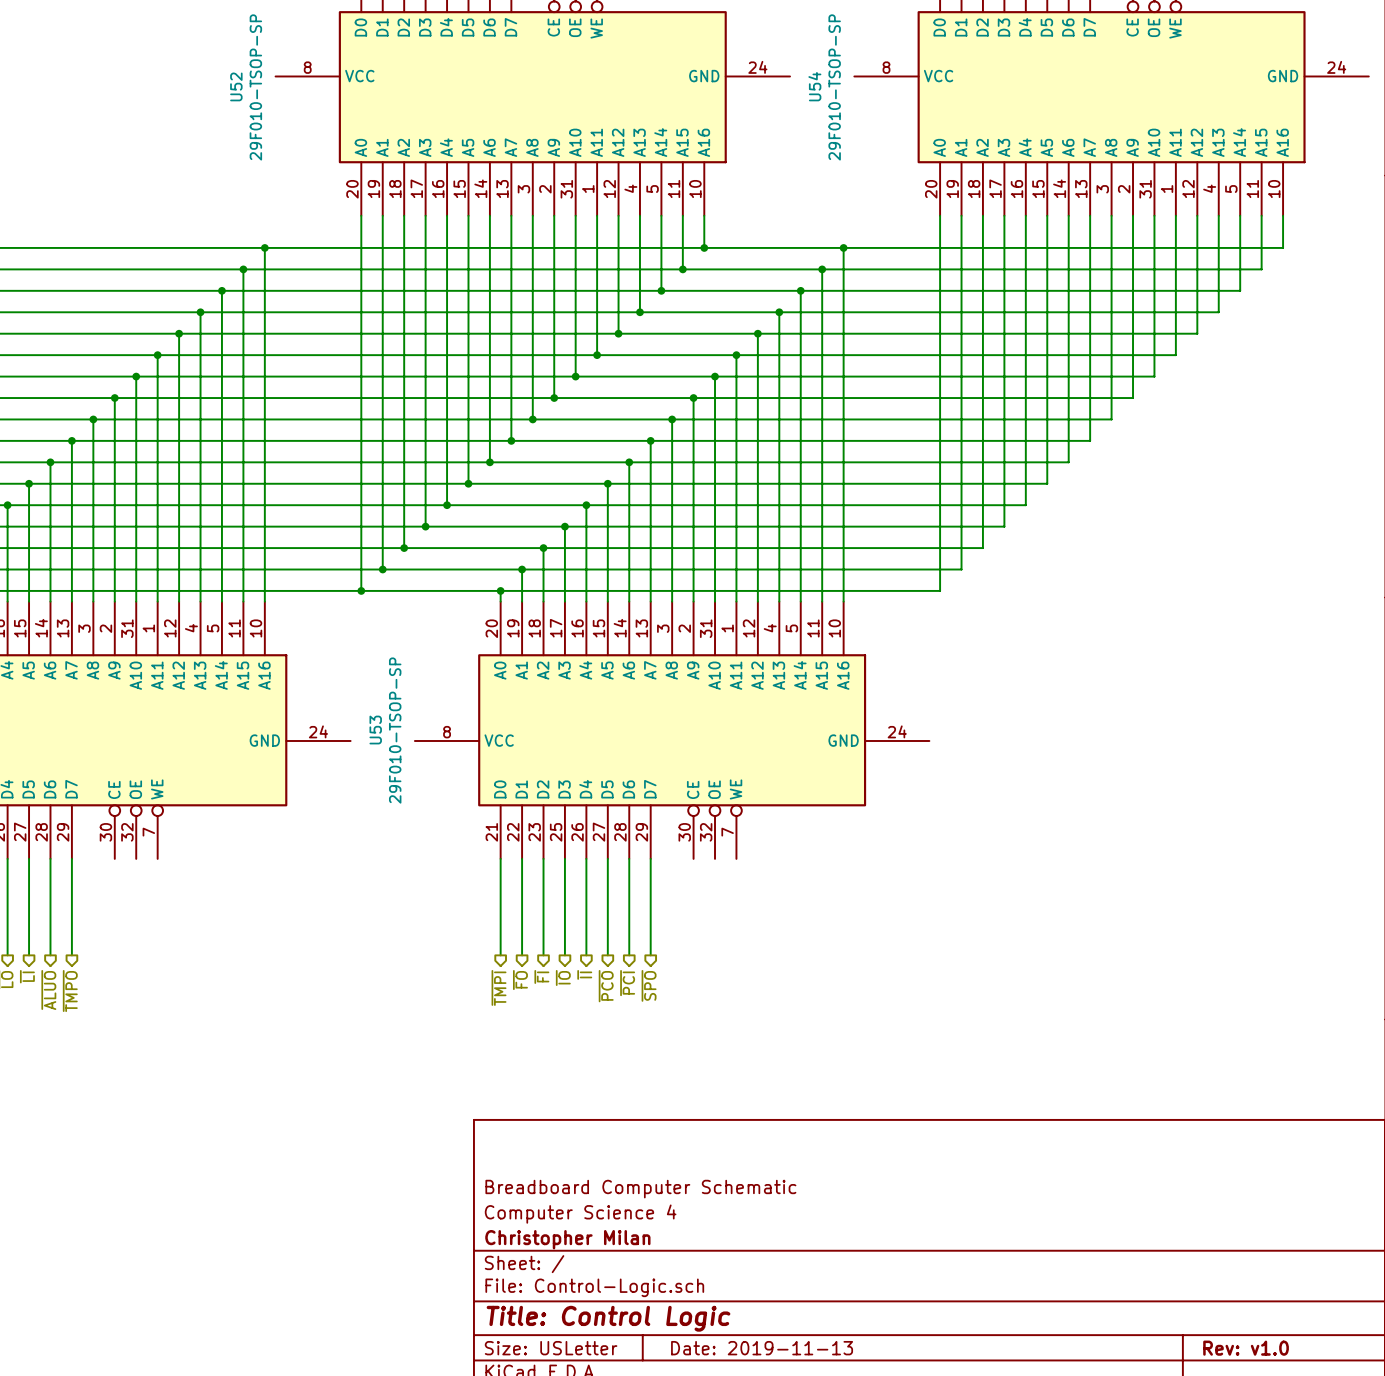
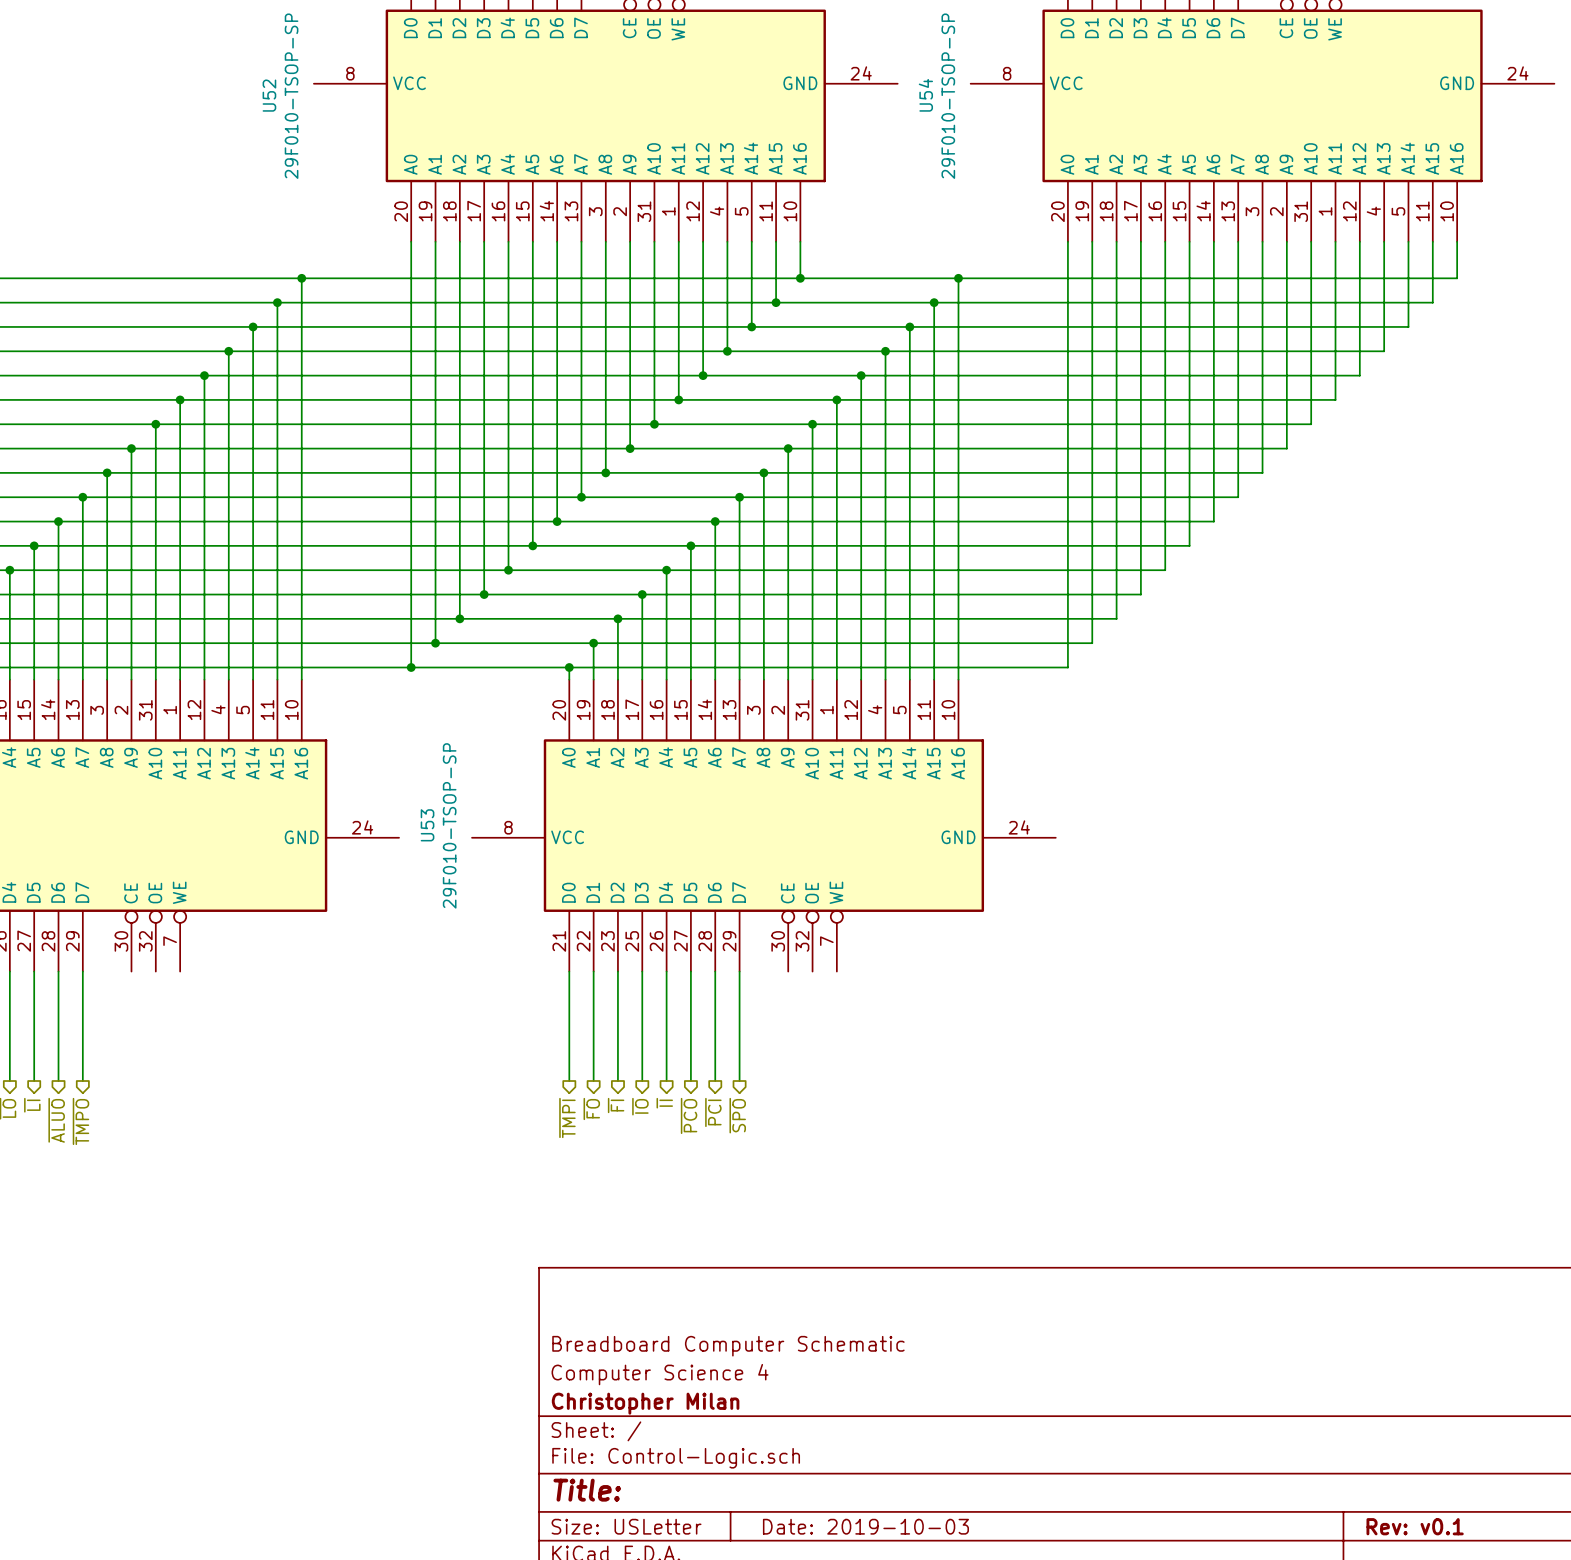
title block: Title: Control Logic (608, 1318) -> Title: (587, 1490)
title block: Date: 2019-11-13 (762, 1348) -> Date: 2019-10-03 (865, 1526)
title block: Rev: v1.0 (1246, 1348) -> Rev: v0.1 (1415, 1526)

